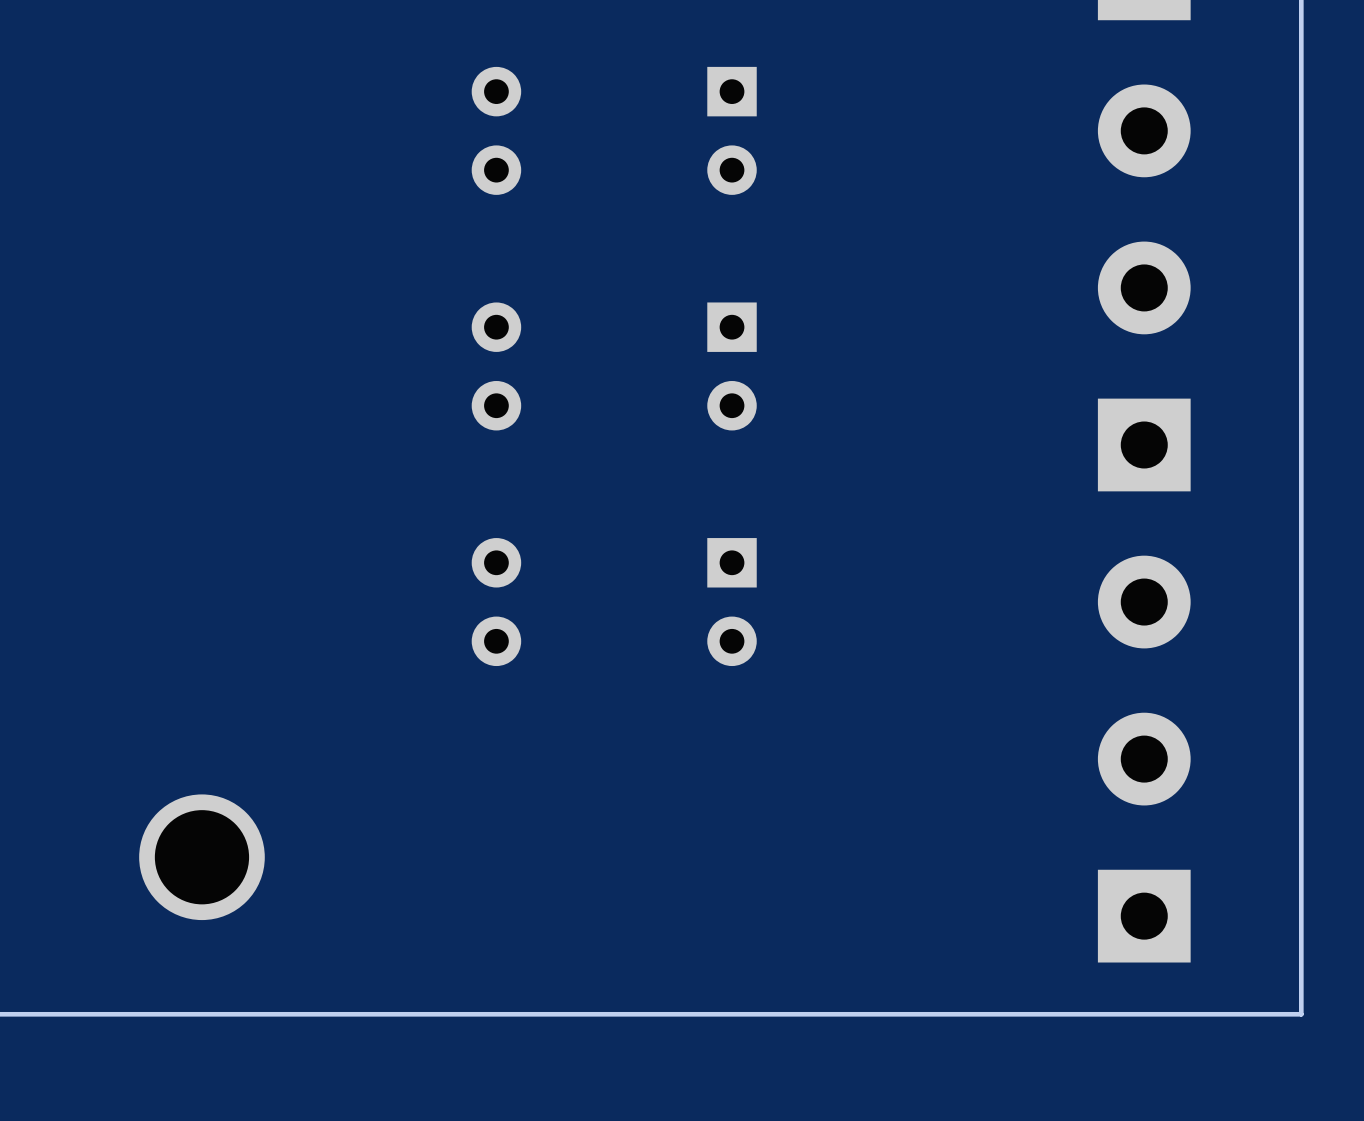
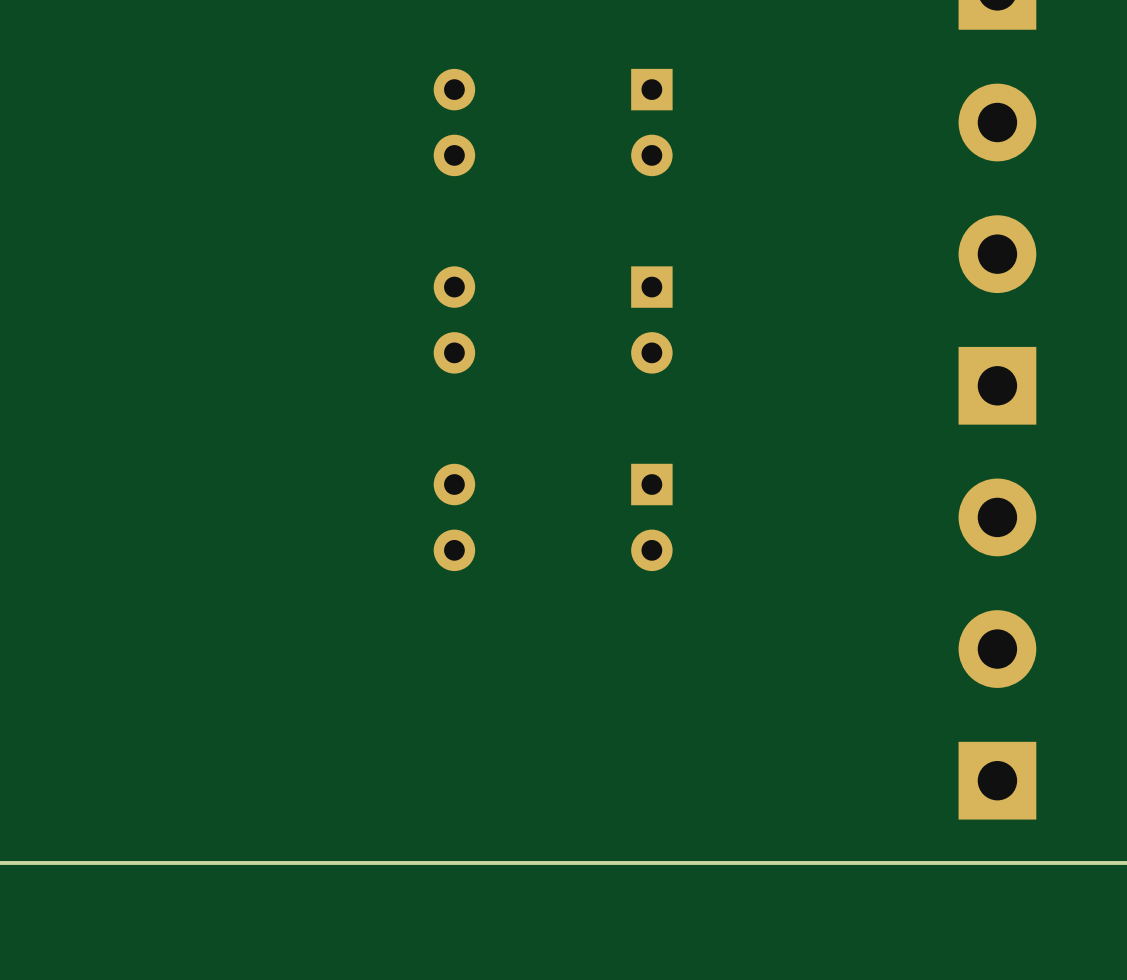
part: (201, 857) -> none

